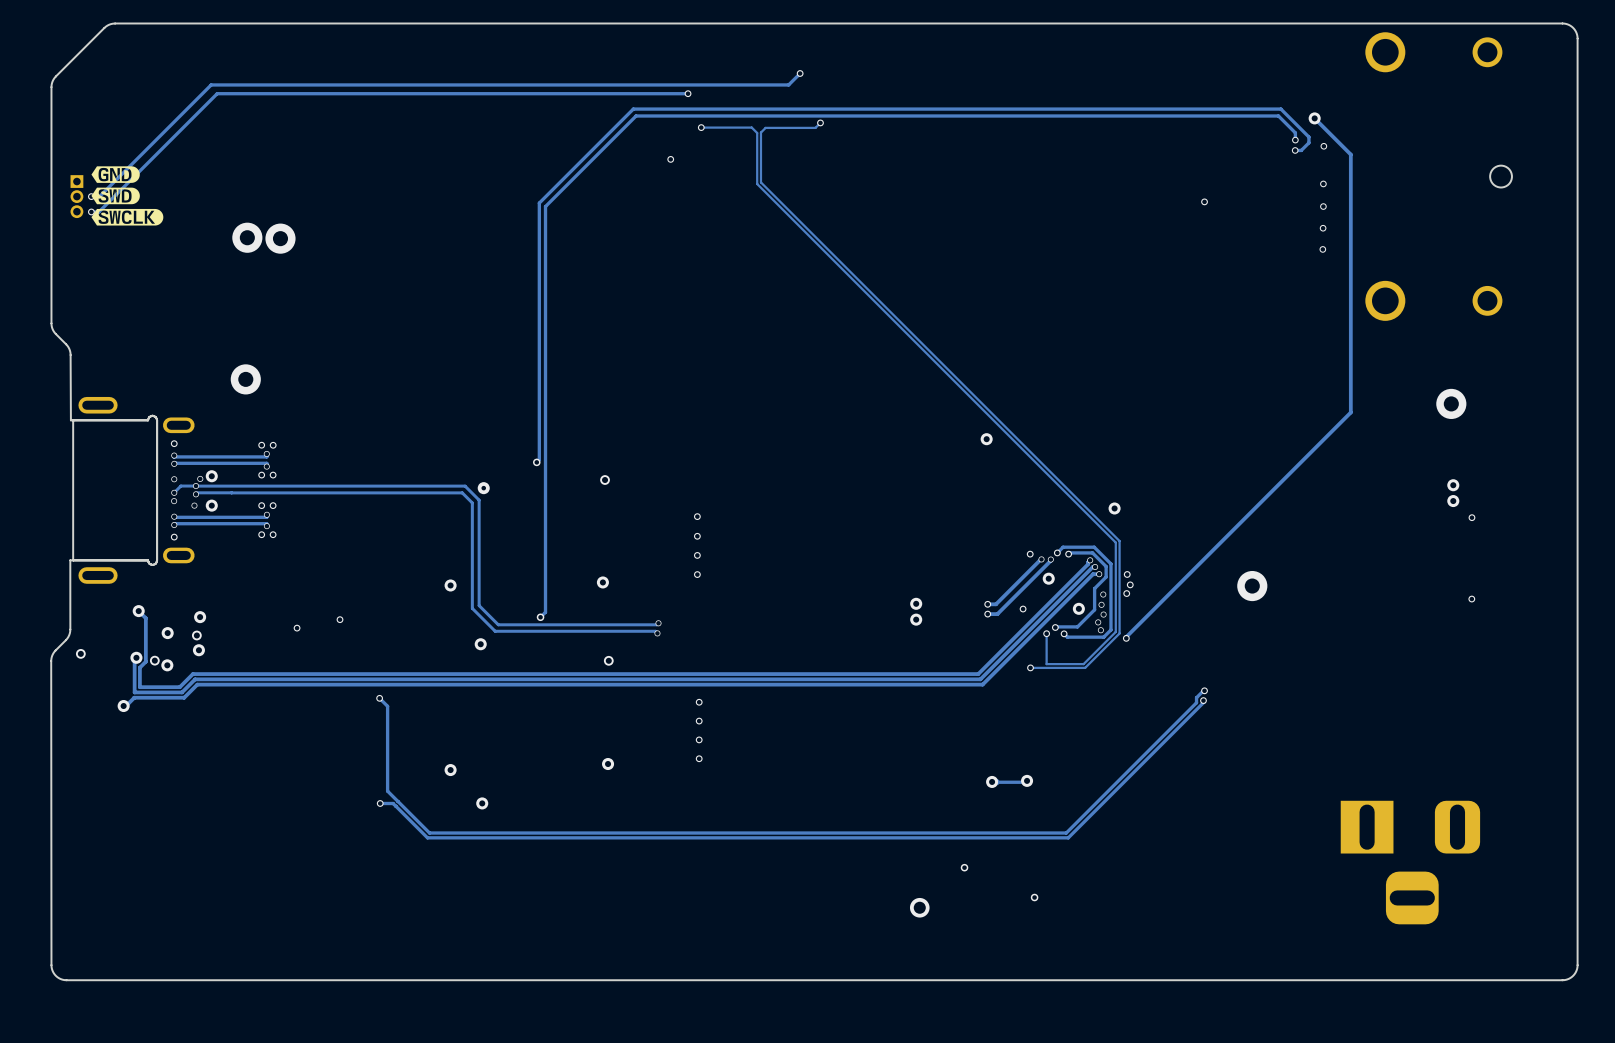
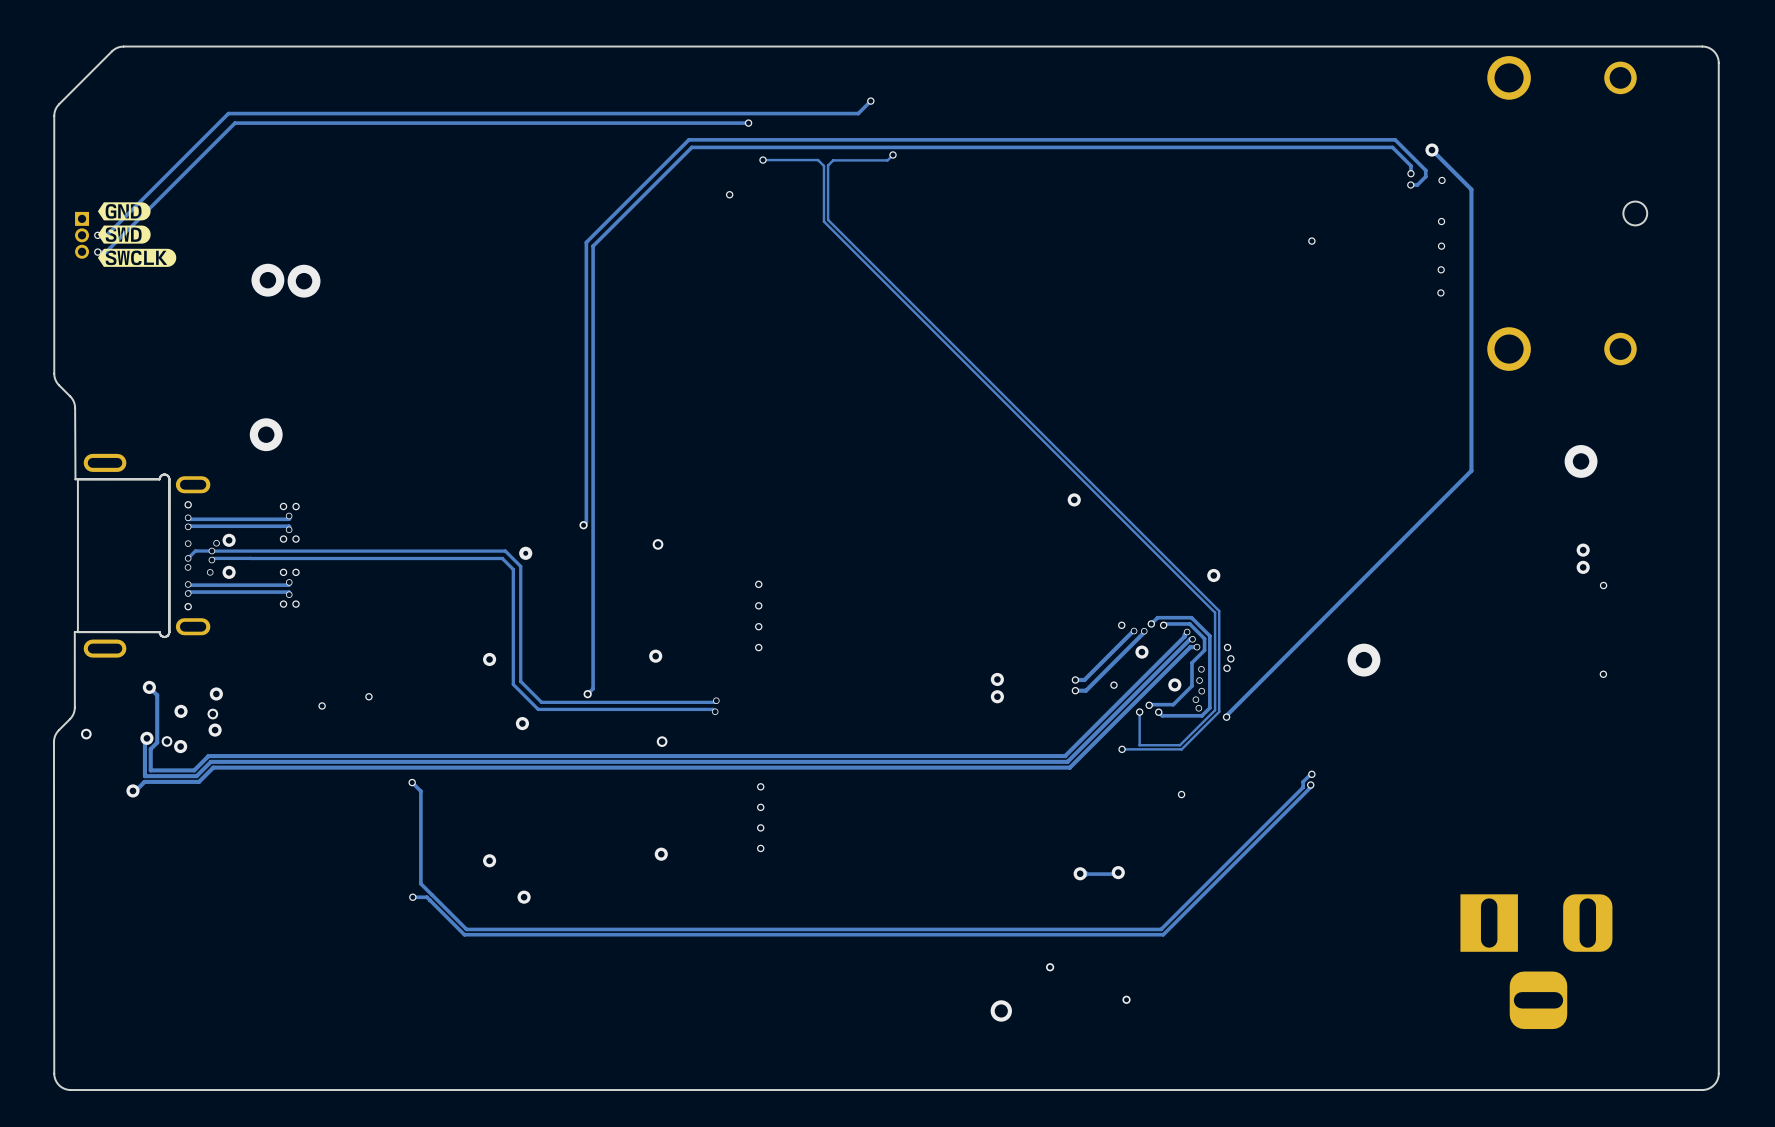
via: none -> (1181, 794)

